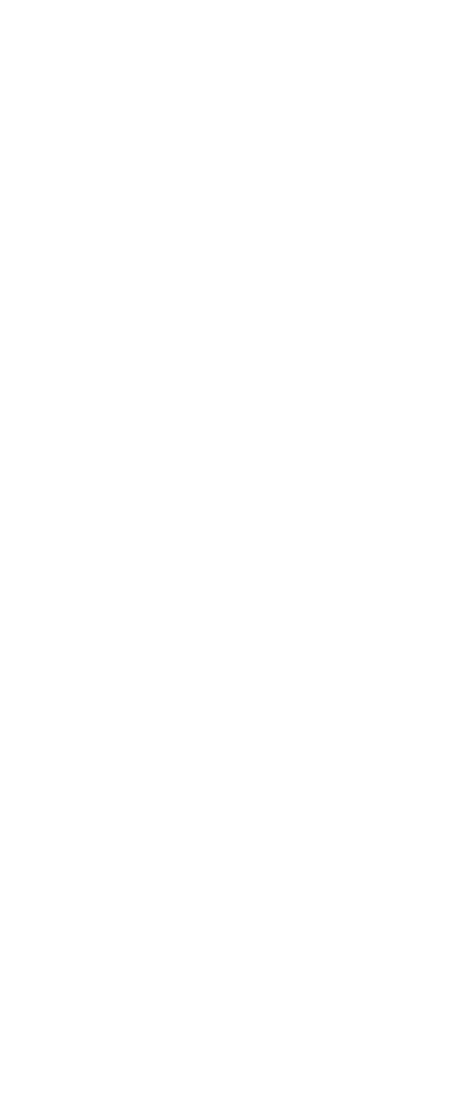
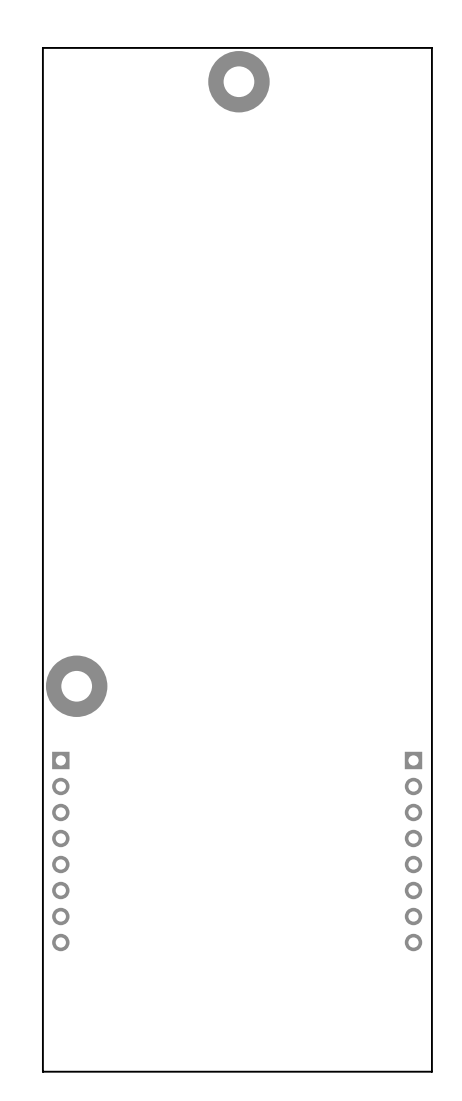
board edge: none -> (431, 47) (42, 47) (42, 1071) (431, 1071) (431, 47)
part: none -> (238, 81)
part: none -> (76, 686)
part: none -> (60, 851)
part: none -> (413, 851)

